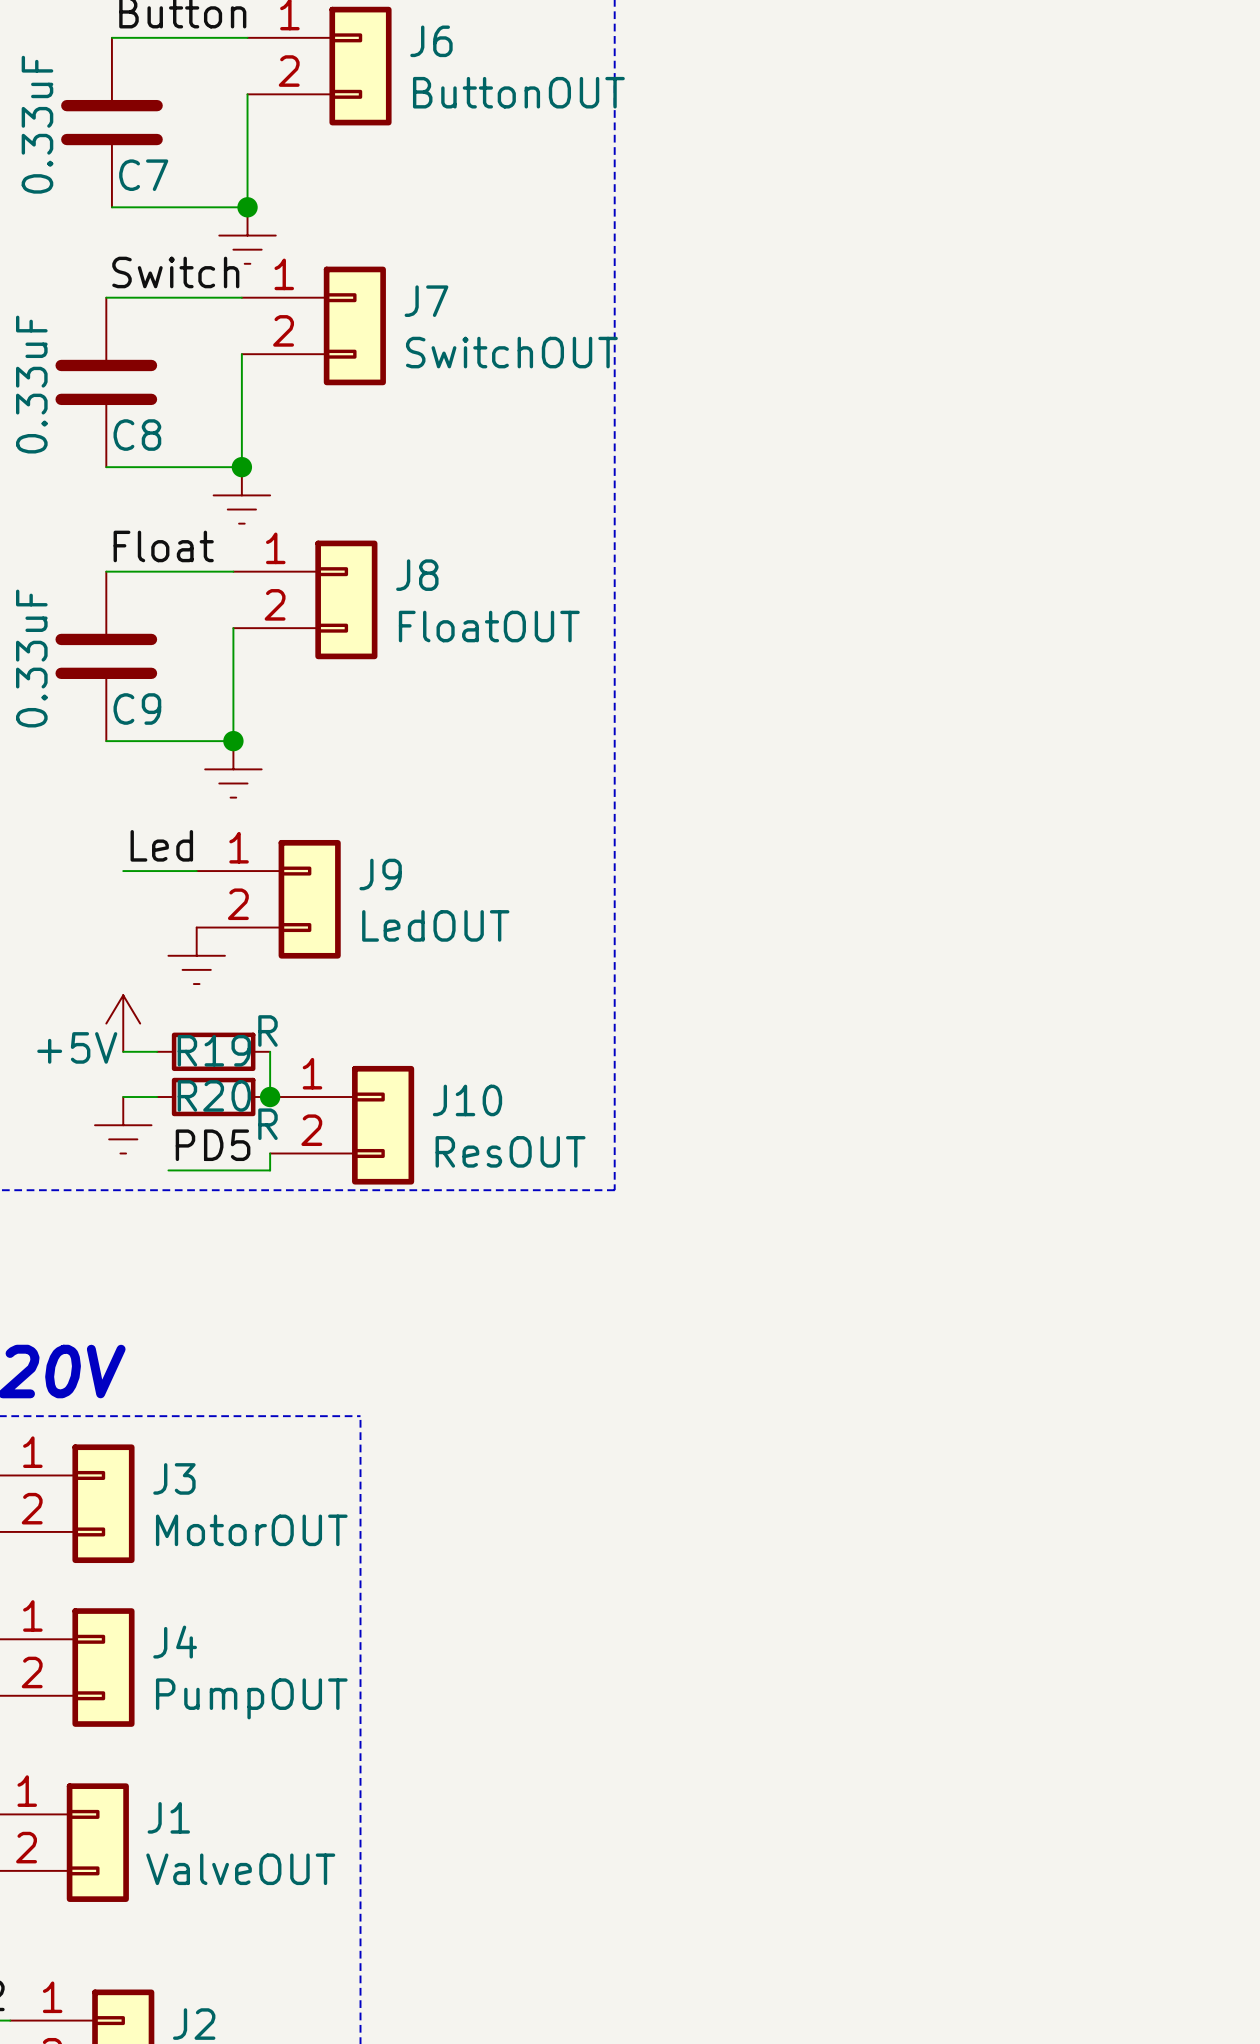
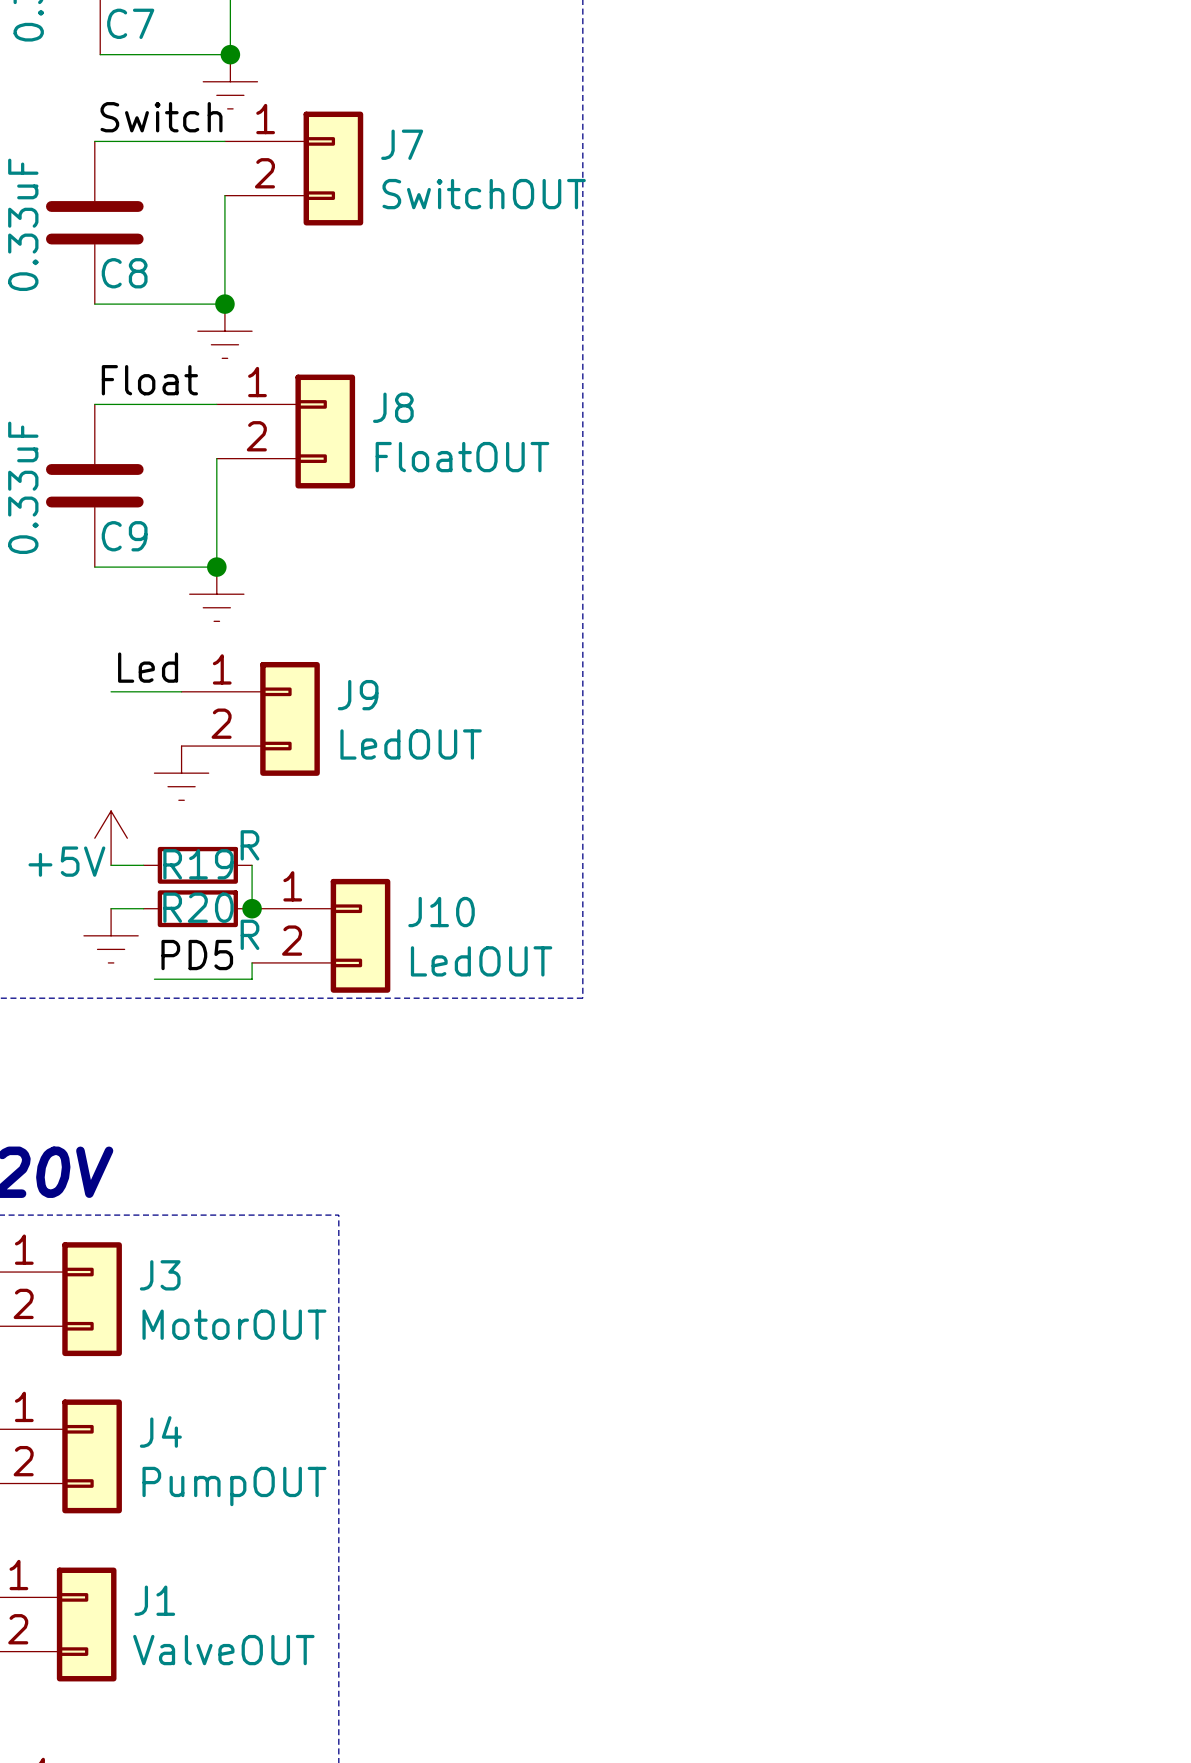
J10 value: ResOUT (510, 1151) -> LedOUT (481, 961)

